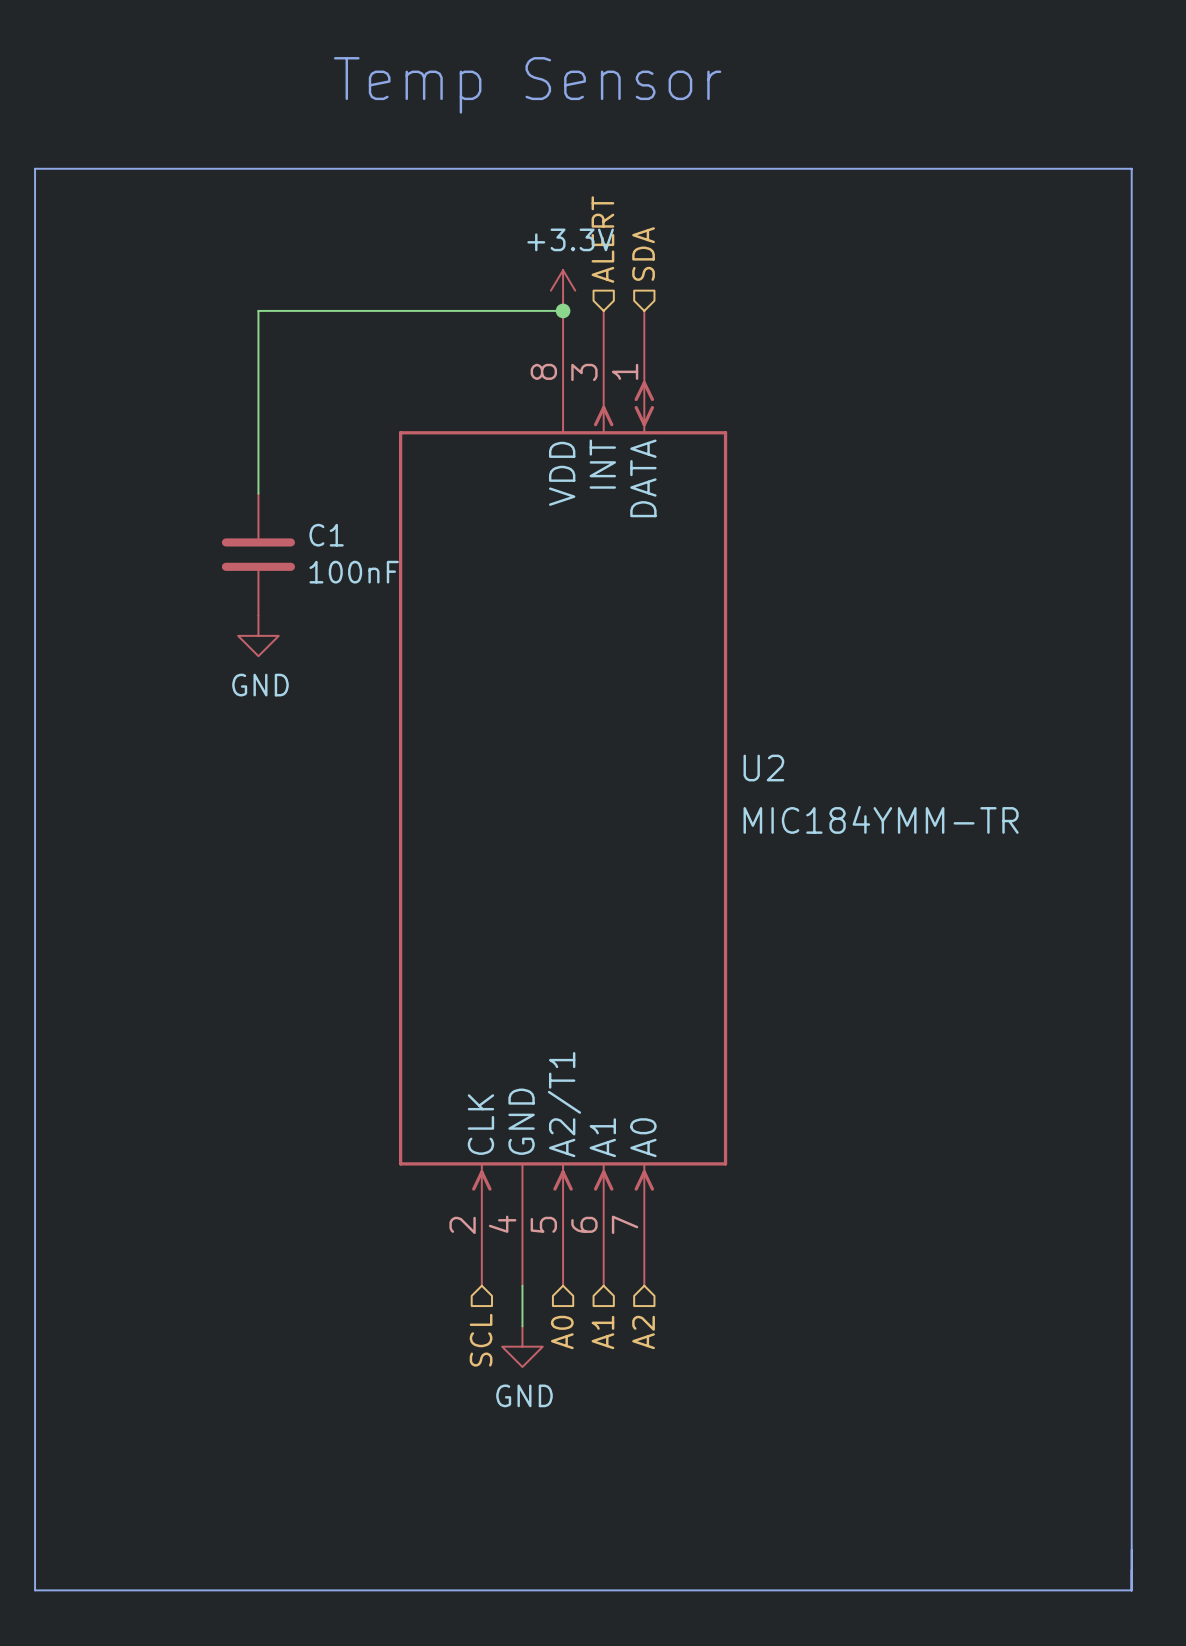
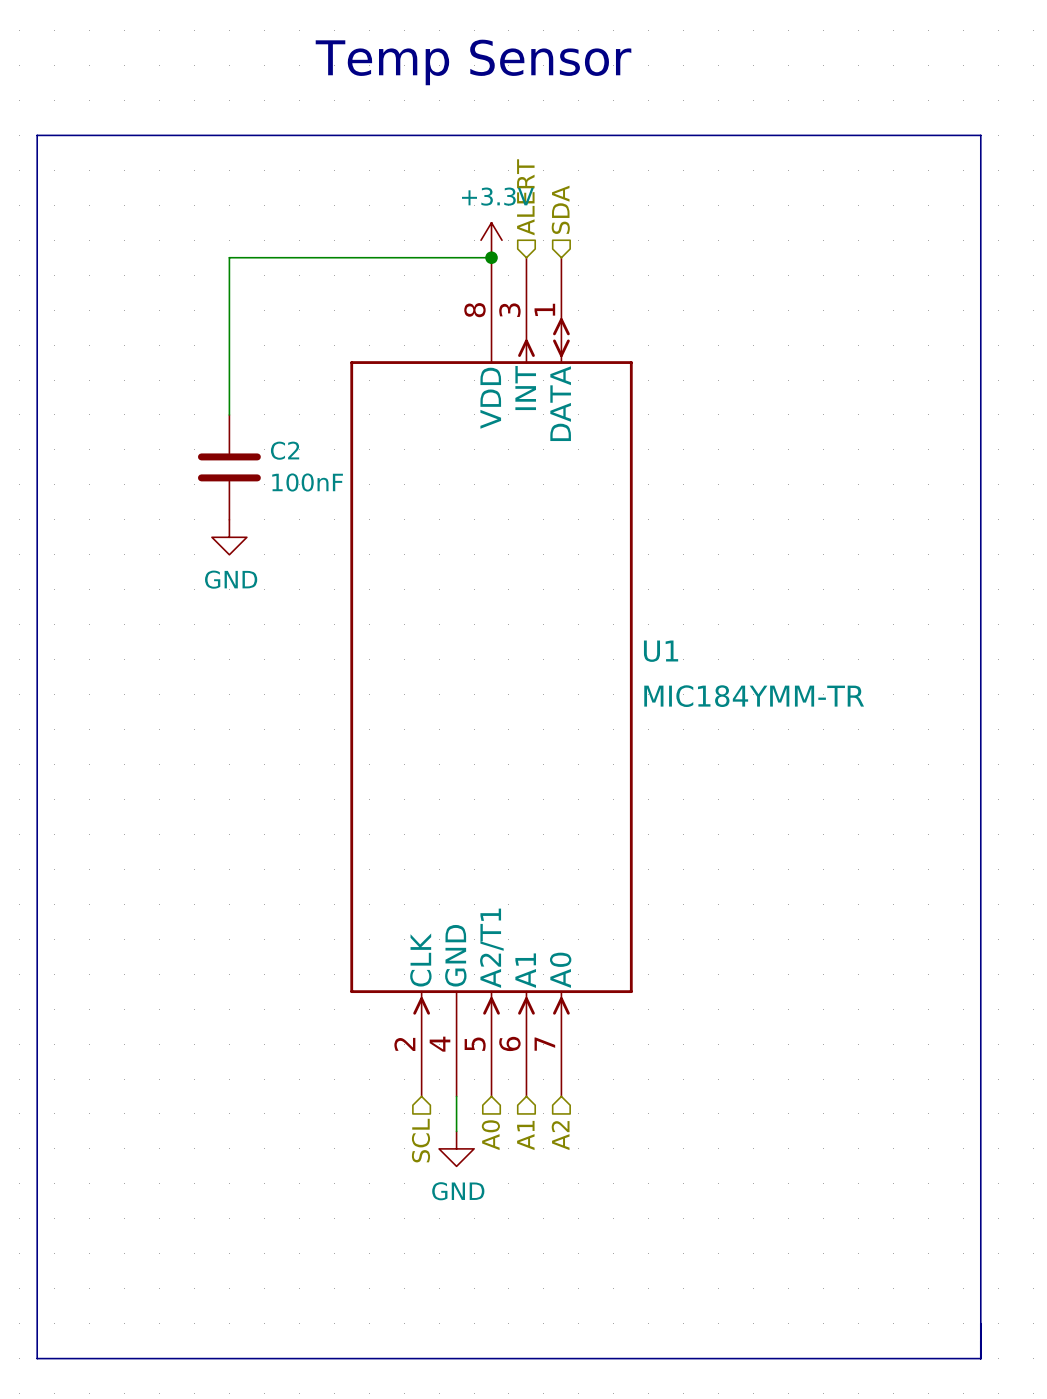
C1 name: C1 (326, 535) -> C2 (285, 450)
U2 name: U2 (763, 768) -> U1 (661, 651)

